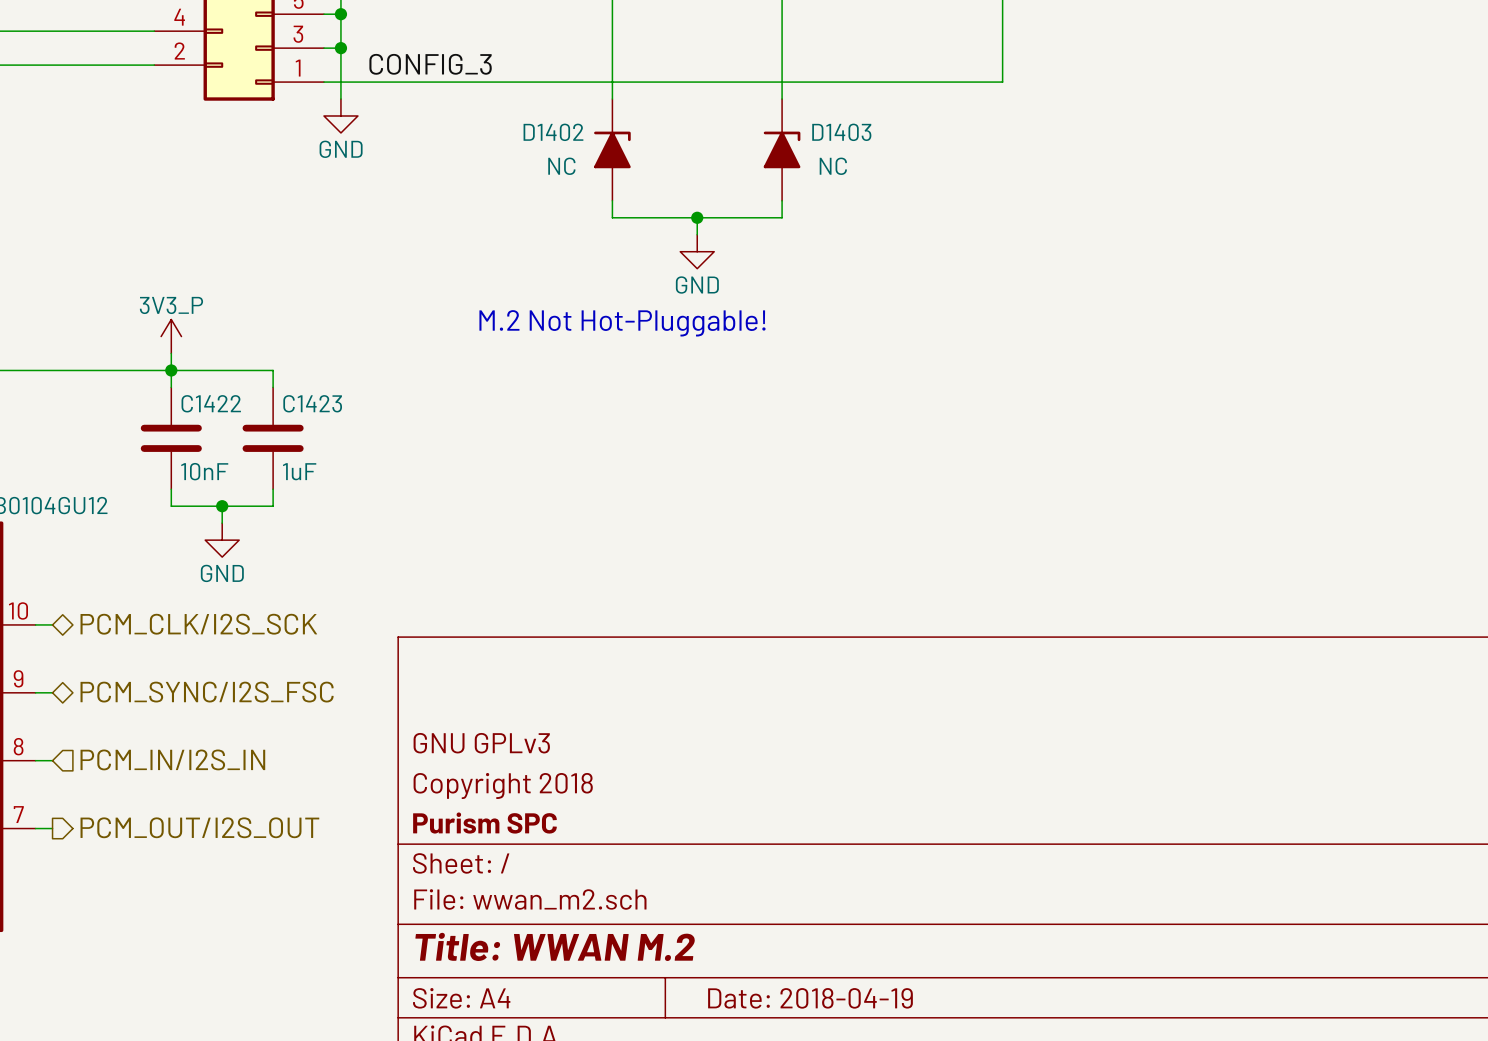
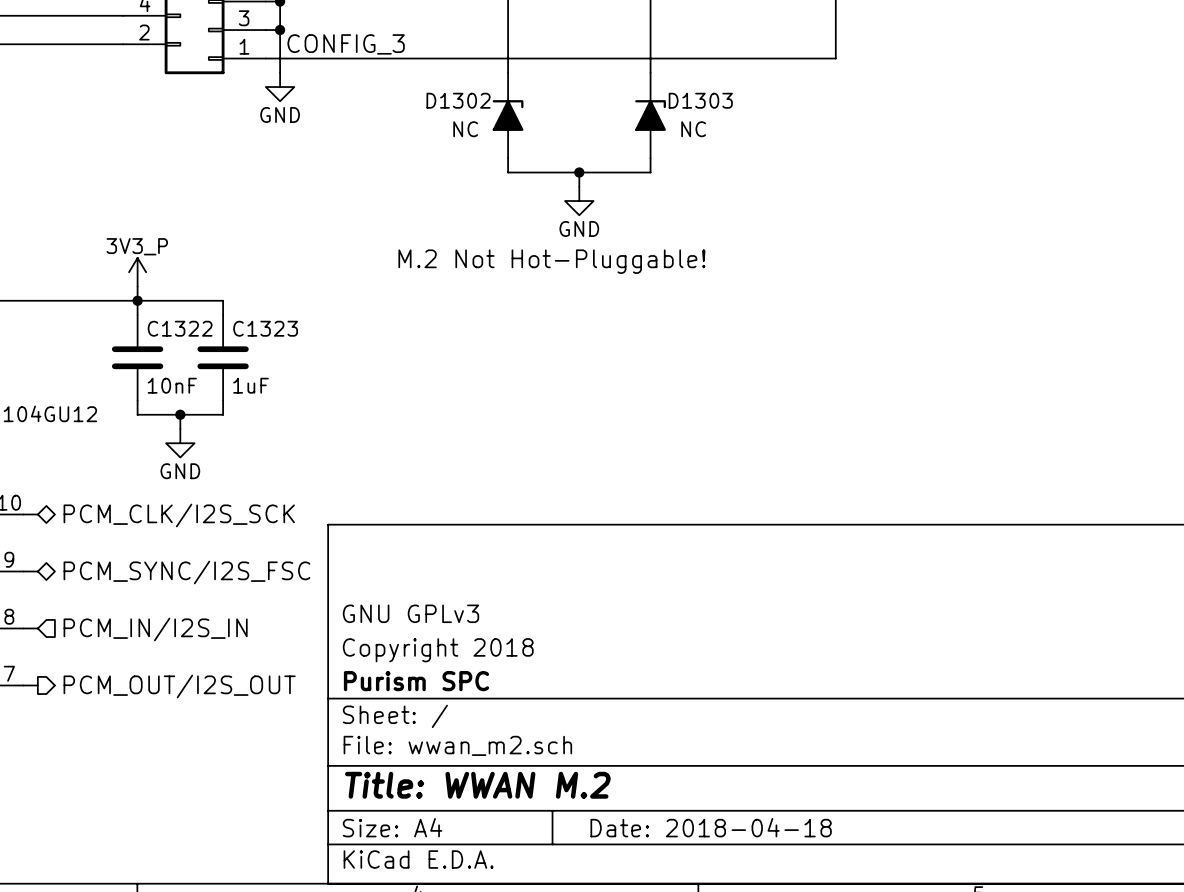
D1402 name: D1402 (553, 132) -> D1302 (458, 100)
D1403 name: D1403 (841, 132) -> D1303 (700, 100)
C1422 name: C1422 (211, 403) -> C1322 (180, 328)
C1423 name: C1423 (312, 403) -> C1323 (265, 328)
title block: Date: 2018-04-19 (810, 998) -> Date: 2018-04-18 (711, 827)

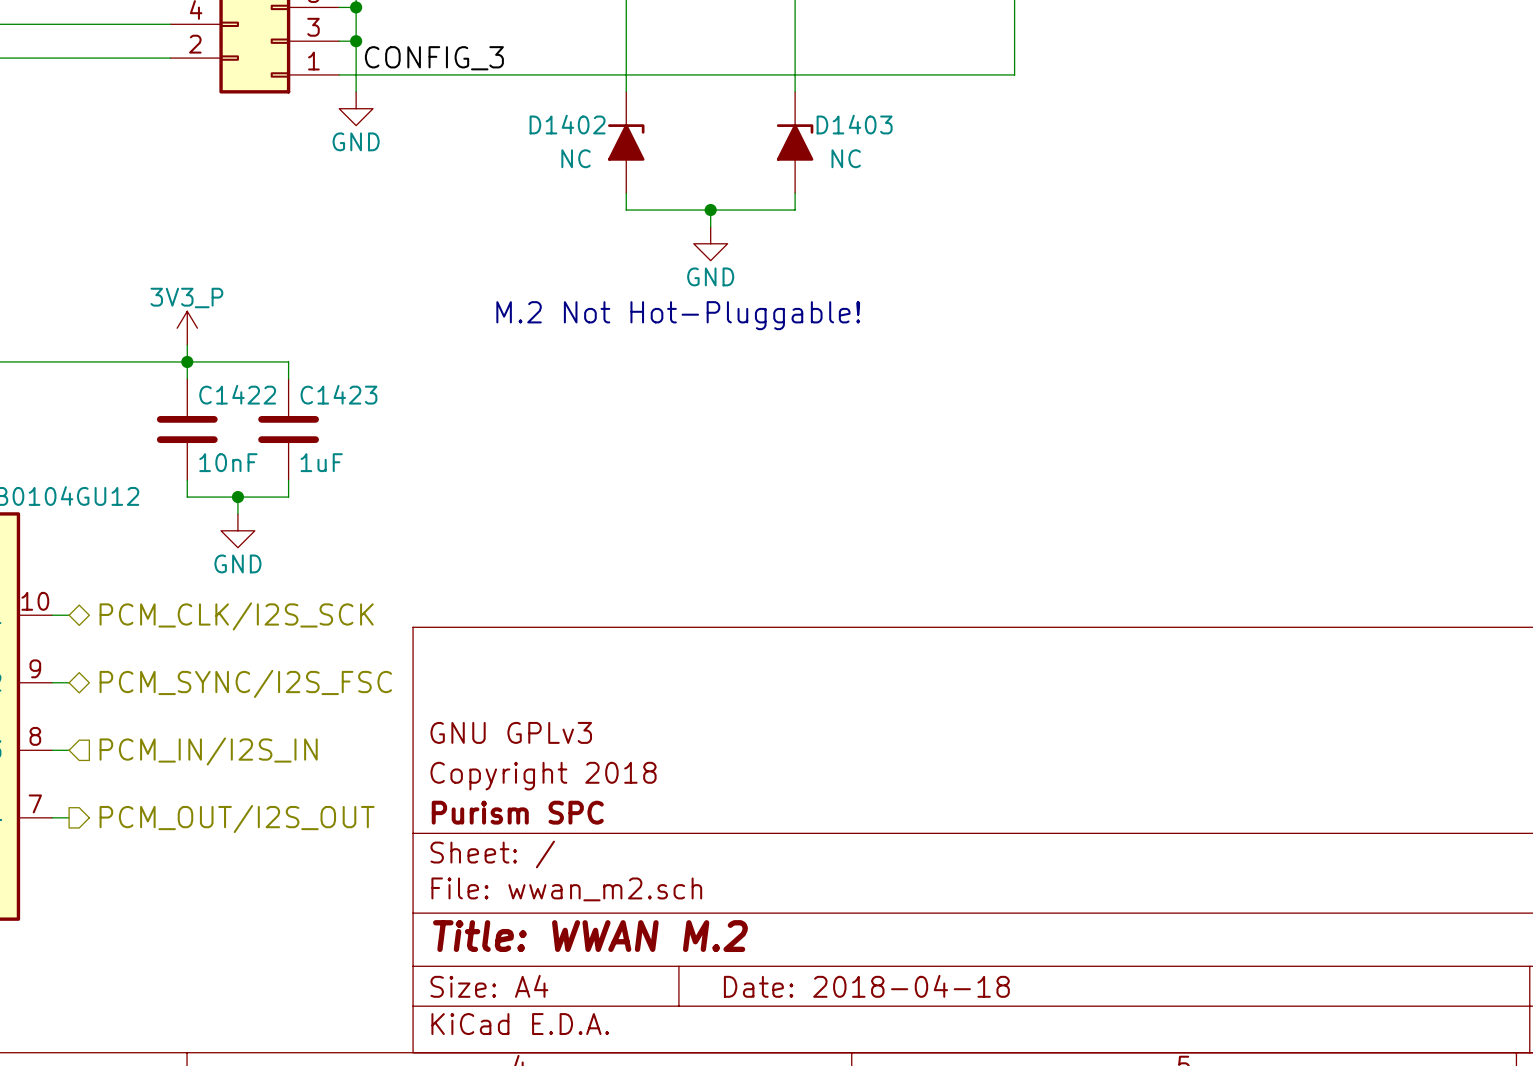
D1302 name: D1302 (458, 100) -> D1402 (567, 124)
D1303 name: D1303 (700, 100) -> D1403 (854, 124)
C1322 name: C1322 (180, 328) -> C1422 (237, 394)
C1323 name: C1323 (265, 328) -> C1423 (338, 394)

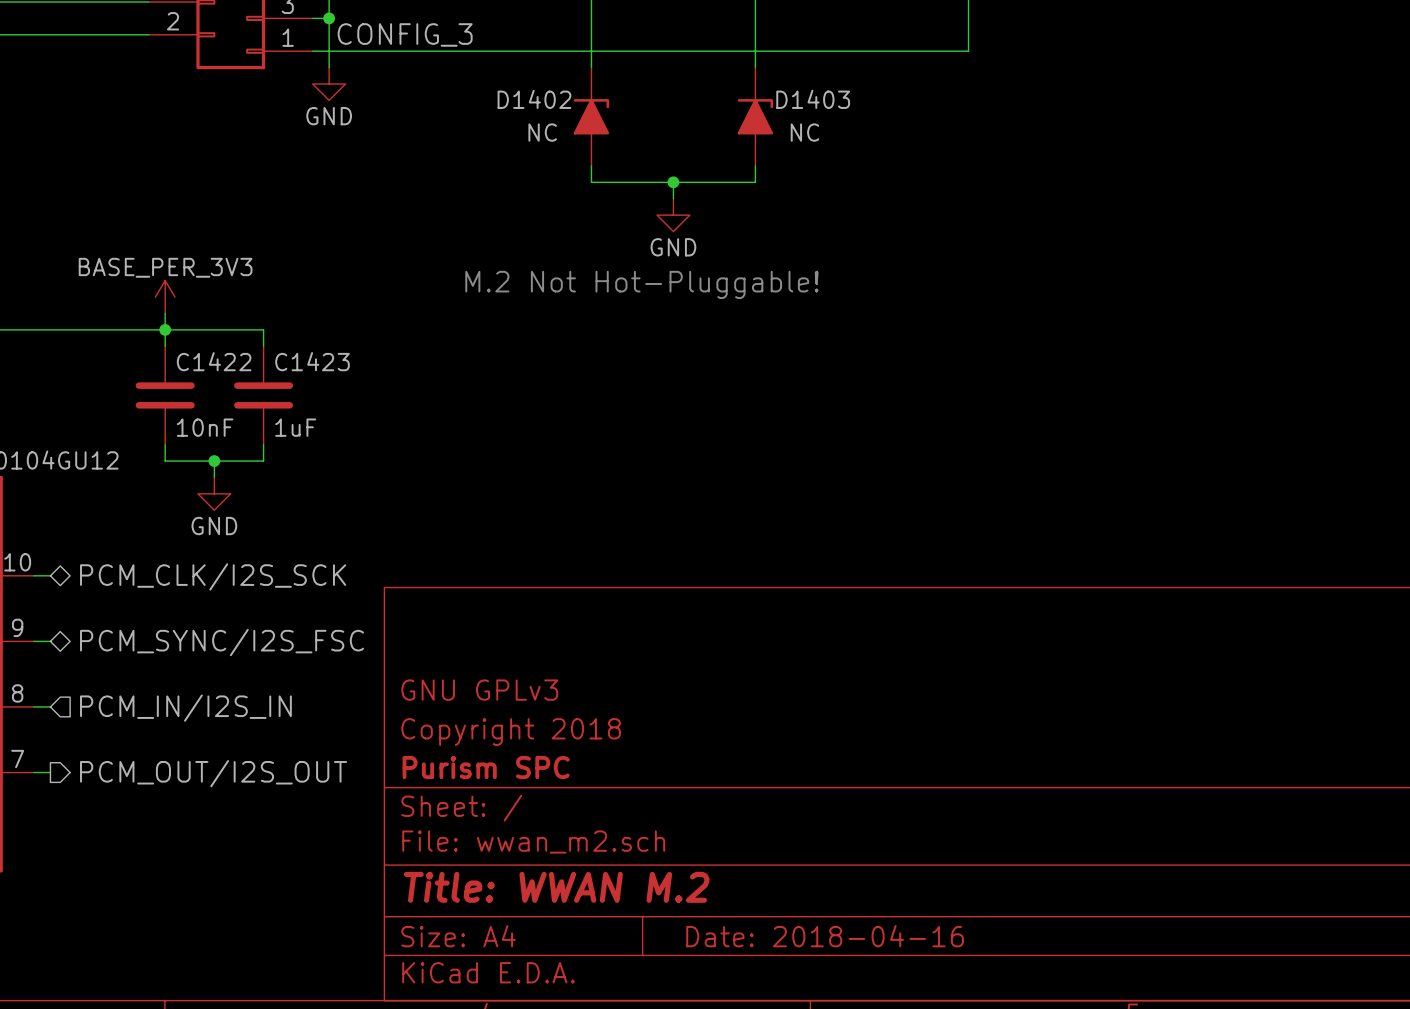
power symbol: 3V3_P (187, 328) -> BASE_PER_3V3 (165, 297)
title block: Date: 2018-04-18 (866, 986) -> Date: 2018-04-16 (825, 936)

